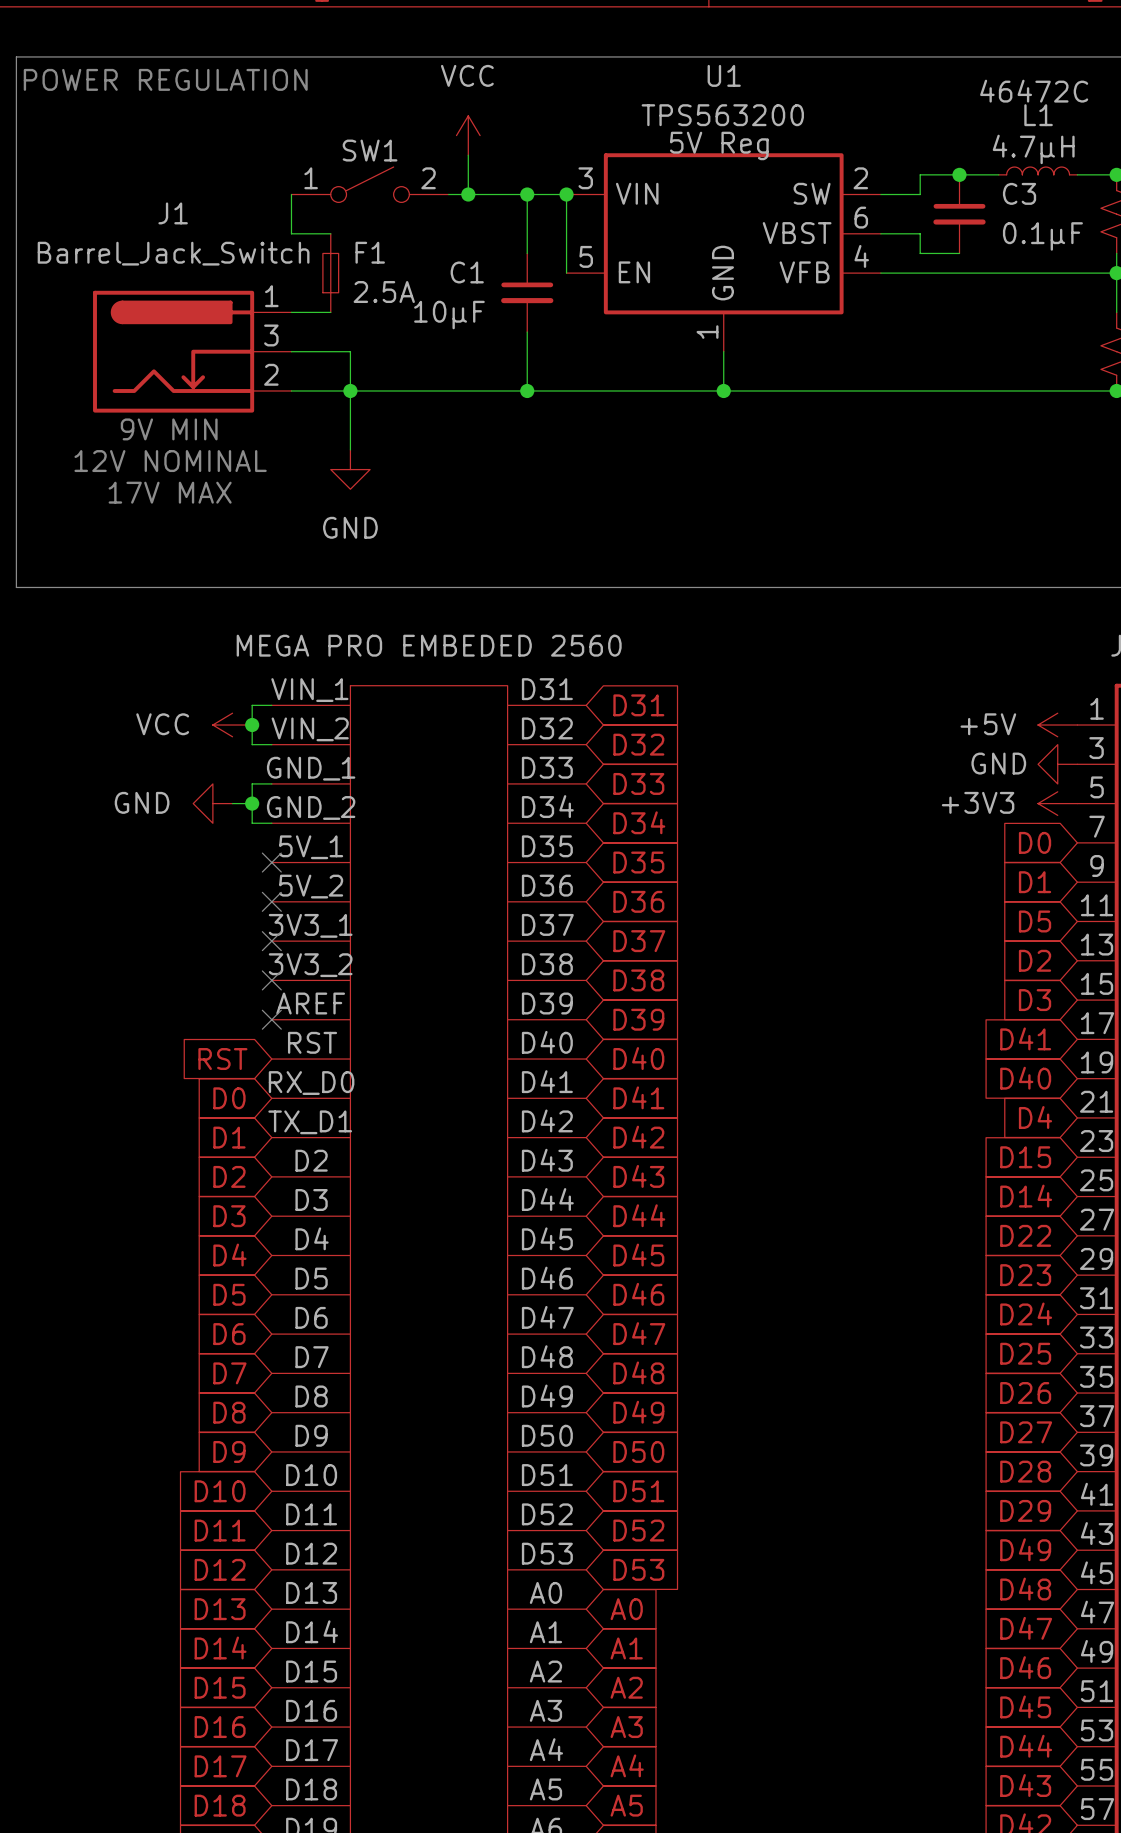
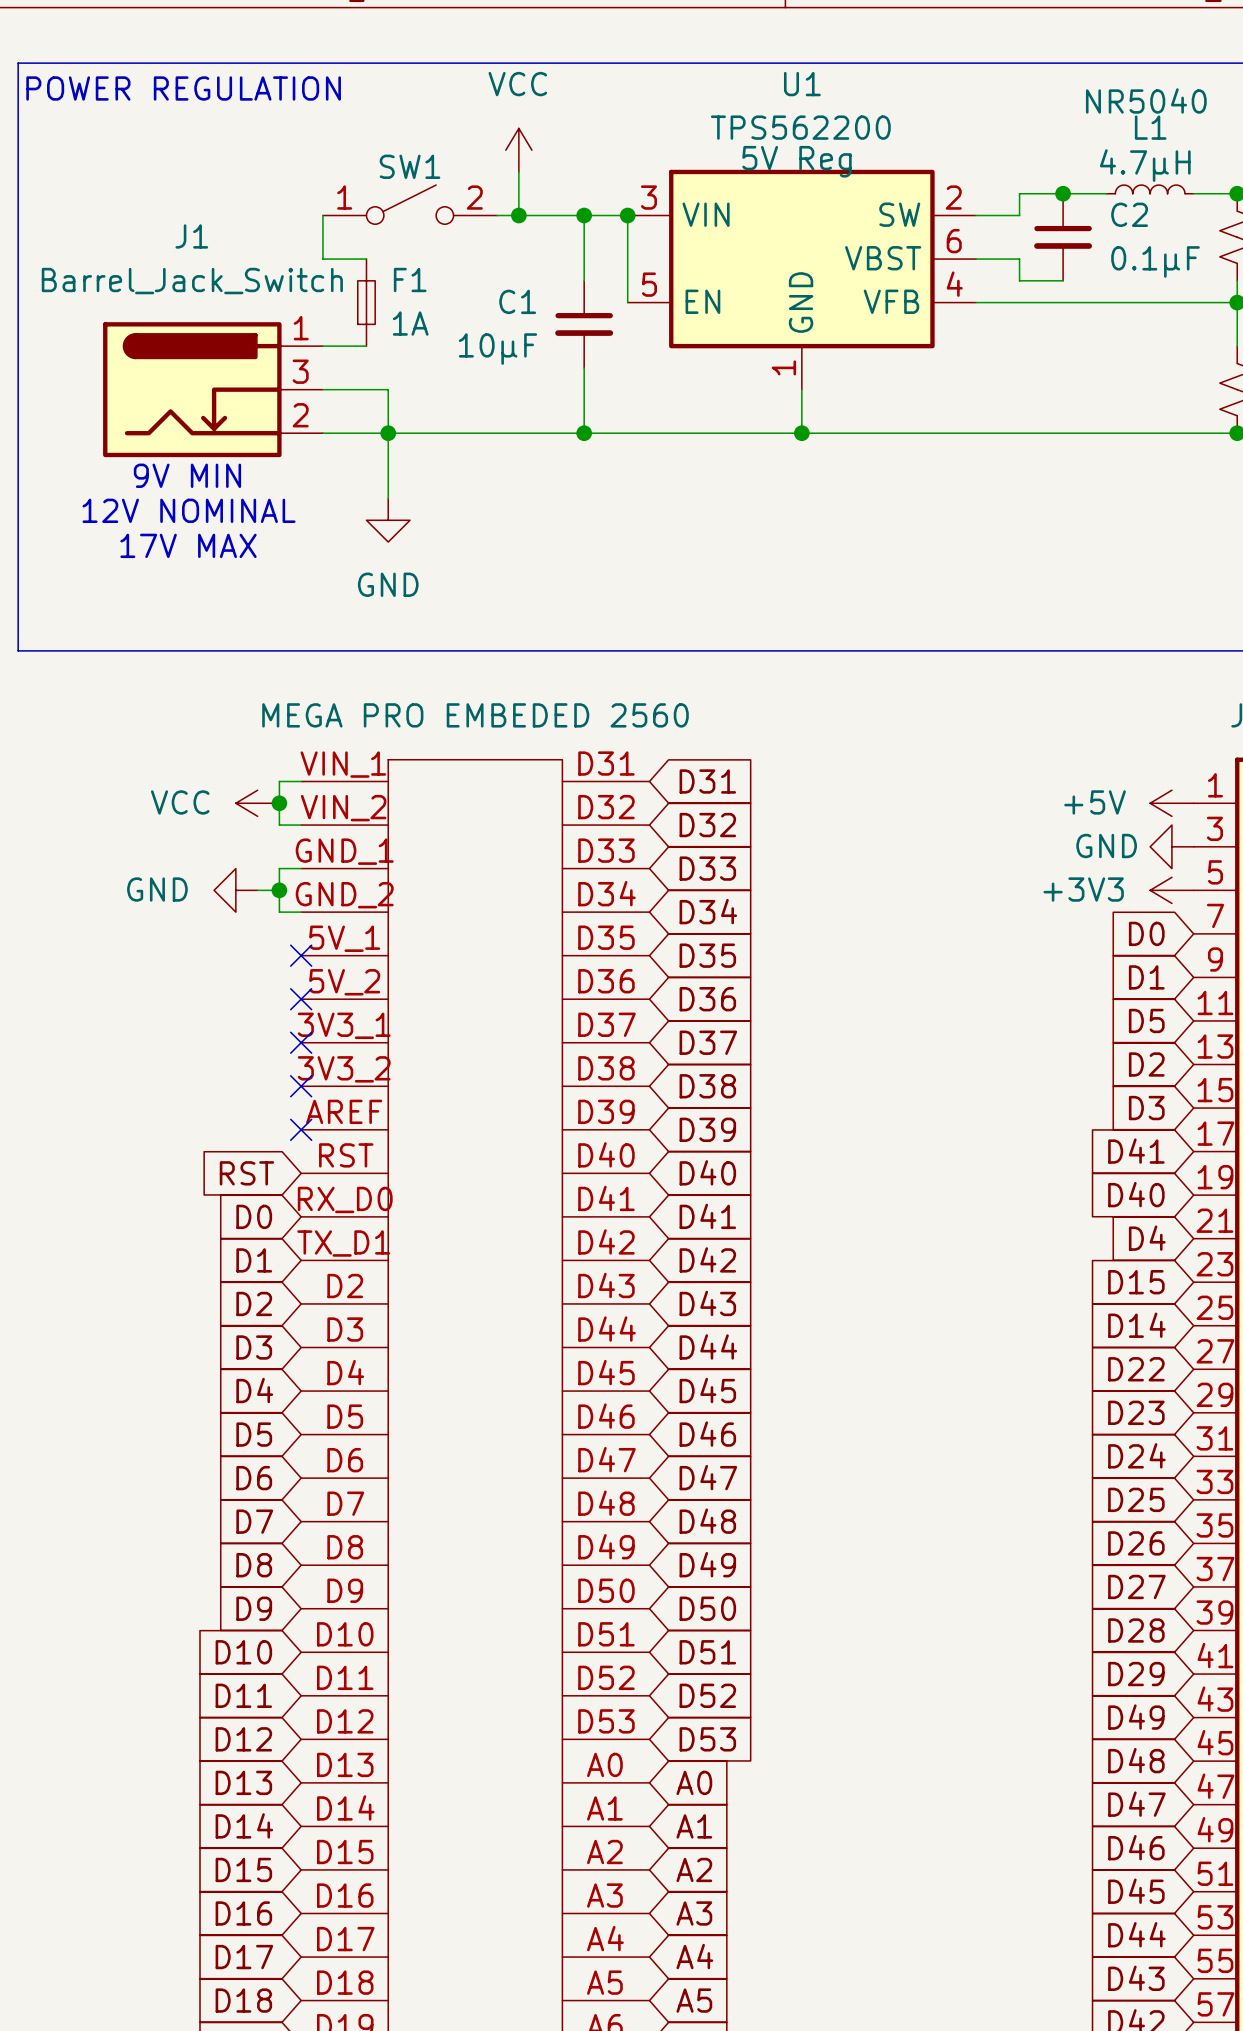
L1 text: 46472C (1034, 91) -> NR5040 (1146, 100)
U1 value: TPS563200 (722, 115) -> TPS562200 (800, 127)
C3 name: C3 (1019, 193) -> C2 (1129, 214)
F1 value: 2.5A (384, 292) -> 1A (410, 323)

